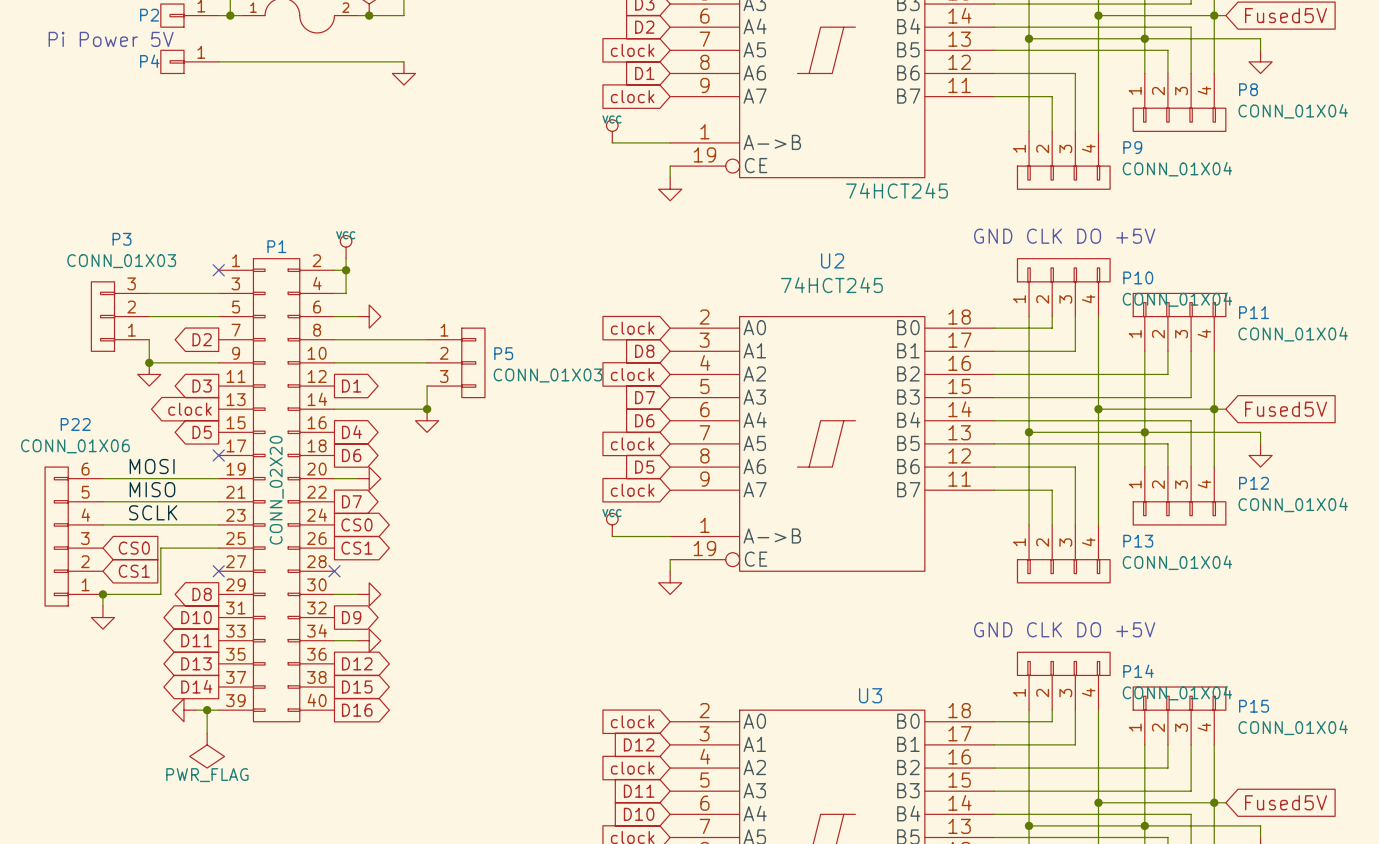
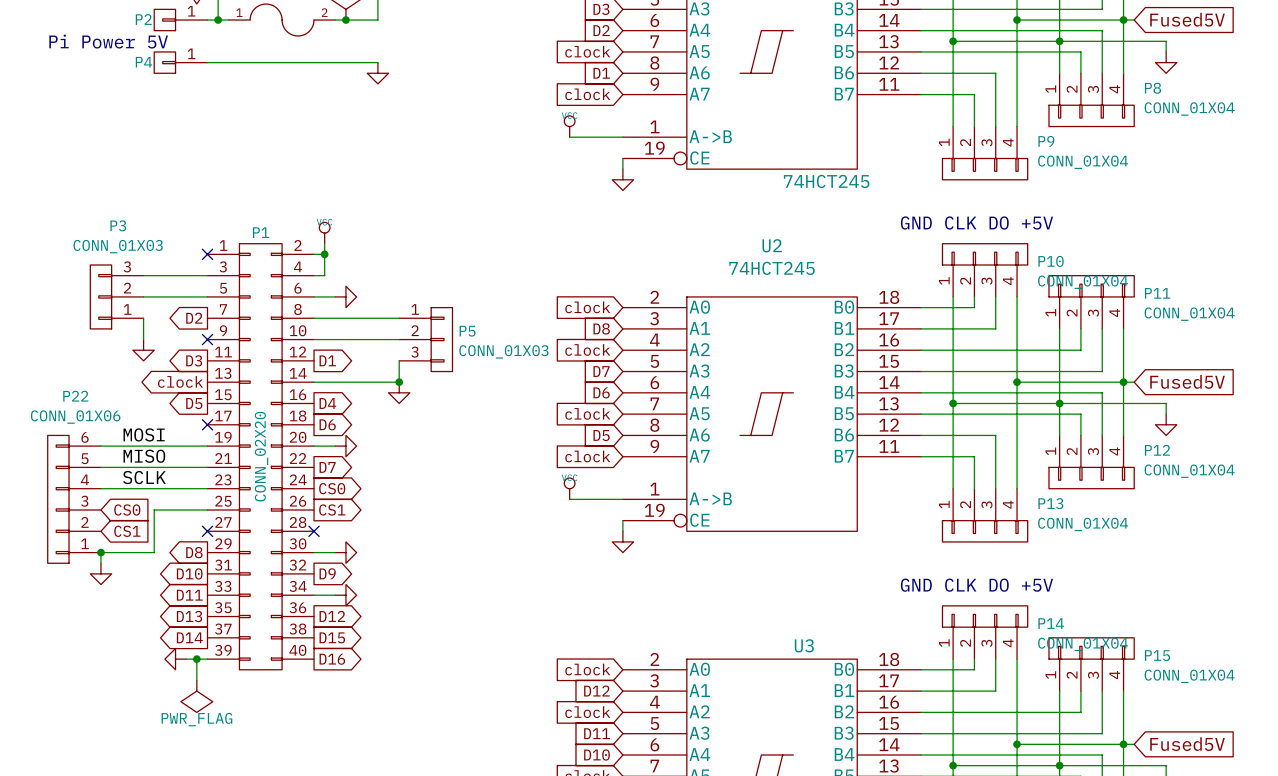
wire: (149, 362) (218, 362) -> none
junction: (149, 362) -> none
no-connect mark: none -> (207, 339)

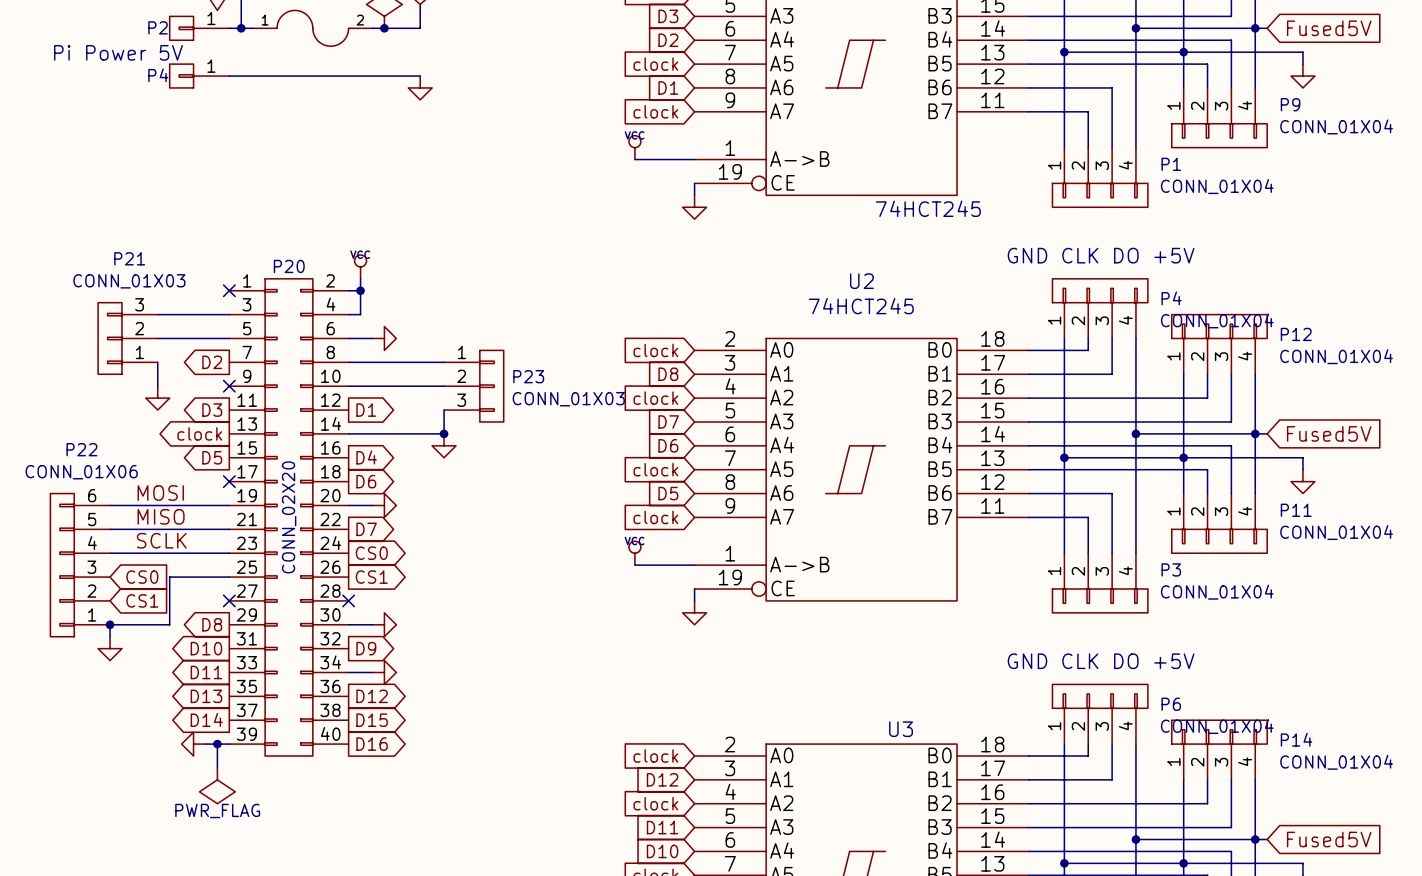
P8 name: P8 (1153, 88) -> P9 (1290, 104)
P9 name: P9 (1046, 141) -> P1 (1171, 164)
P3 name: P3 (118, 225) -> P21 (129, 258)
P1 name: P1 (261, 232) -> P20 (289, 266)
P10 name: P10 (1051, 261) -> P4 (1171, 298)
P11 name: P11 (1157, 293) -> P12 (1296, 334)
P5 name: P5 (467, 331) -> P23 (528, 376)
P12 name: P12 (1157, 450) -> P11 (1296, 510)
P13 name: P13 (1050, 503) -> P3 (1171, 569)
P14 name: P14 (1051, 623) -> P6 (1171, 704)
P15 name: P15 (1157, 655) -> P14 (1296, 739)

